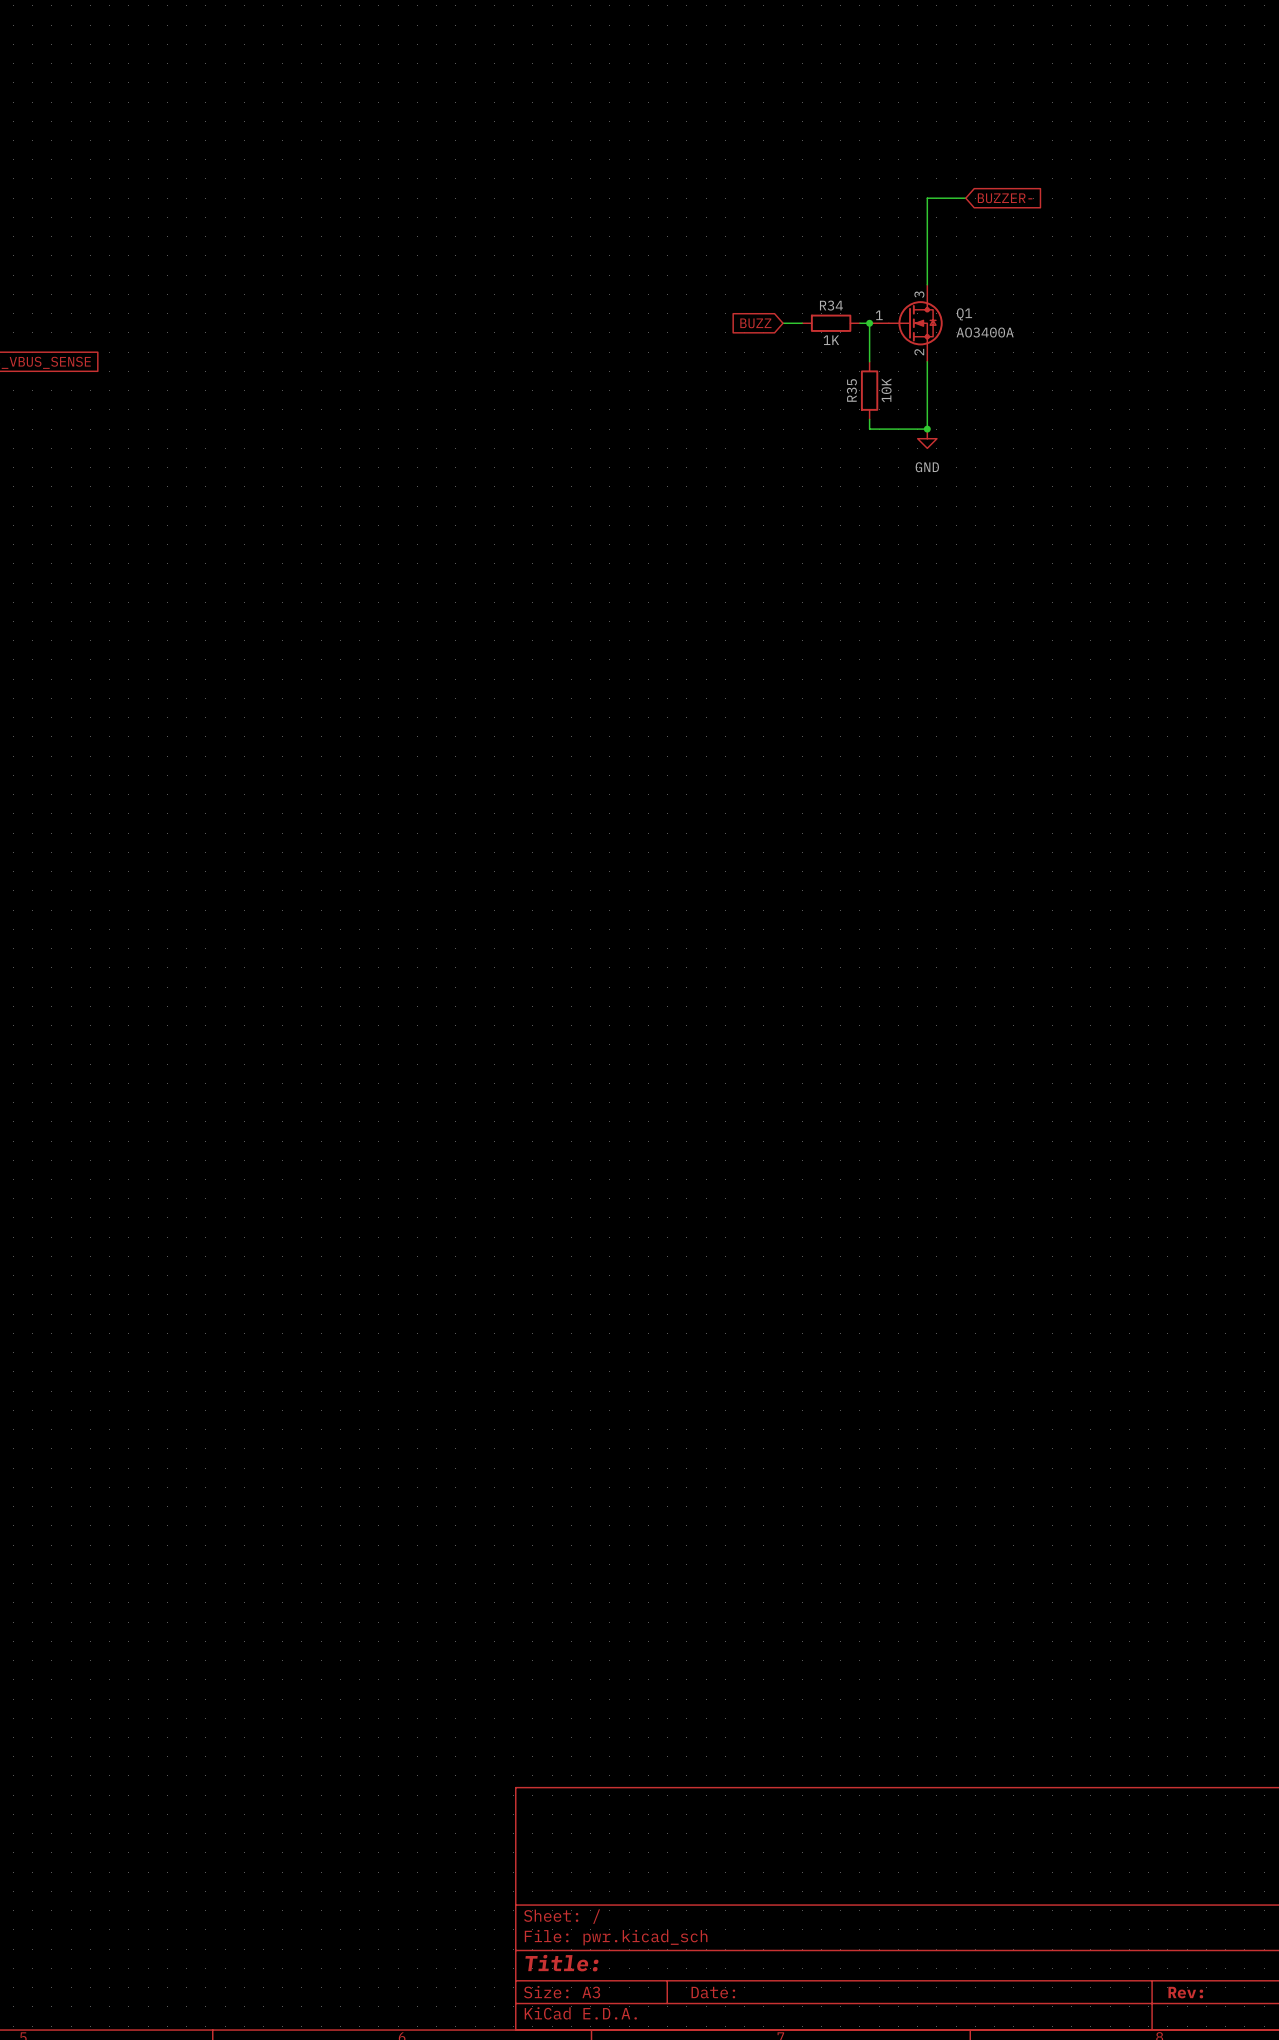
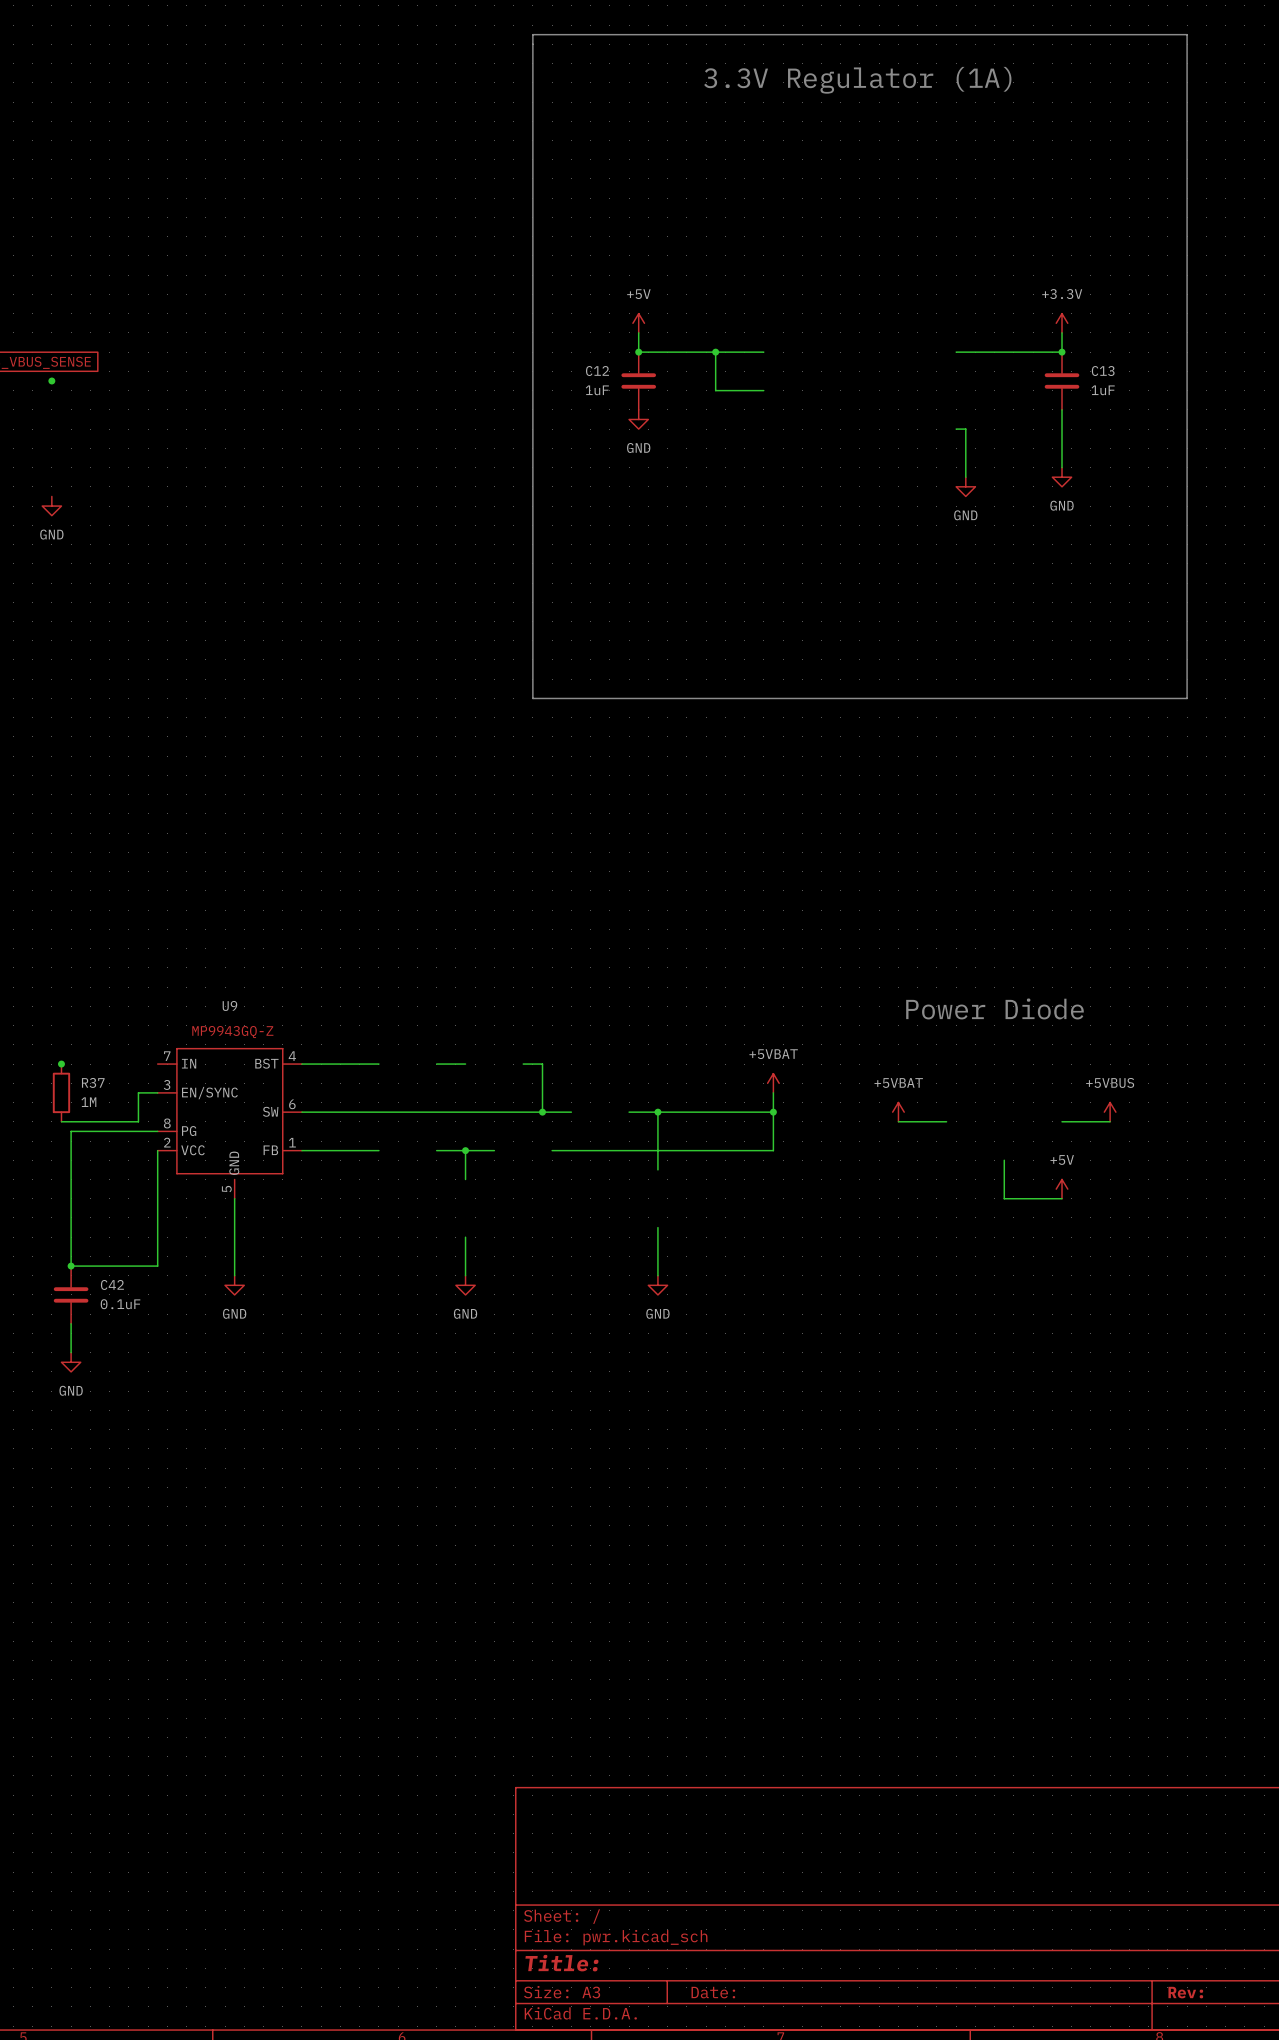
line: none -> (532, 34) (1187, 34) (1187, 698) (532, 698) (532, 34)
text: none -> 3.3V Regulator (1A) (857, 80)
wire: (965, 198) (927, 198) (927, 284) -> none
global label: BUZZER- (1005, 198) -> none
power symbol: none -> +5V (638, 323)
global label: BUZZ (755, 323) -> none
wire: (783, 323) (802, 323) -> none
R34: 1K (831, 323) -> none
wire: (859, 323) (869, 323) (869, 361) -> none
junction: (869, 323) -> none
Q1: AO3400A (906, 323) -> none
power symbol: none -> +3.3V (1062, 323)
wire: none -> (638, 332) (638, 352) (763, 352)
wire: none -> (1062, 332) (1062, 352) (956, 352)
junction: none -> (638, 352)
wire: none -> (715, 352) (715, 390) (763, 390)
junction: none -> (715, 352)
junction: none -> (1062, 352)
wire: (927, 361) (927, 429) (869, 429) (869, 419) -> none
junction: none -> (51, 380)
C12: none -> 1uF (638, 380)
C13: none -> 1uF (1062, 380)
R35: 10K (869, 390) -> none
wire: none -> (1062, 409) (1062, 467)
power symbol: none -> GND (638, 419)
junction: (927, 429) -> none
wire: none -> (956, 429) (965, 429) (965, 477)
power symbol position: GND (927, 438) -> GND (965, 486)
power symbol: none -> GND (1062, 477)
power symbol: none -> GND (51, 506)
text: none -> Power Diode (994, 1008)
junction: none -> (61, 1064)
wire: none -> (301, 1064) (378, 1064)
wire: none -> (436, 1064) (465, 1064)
wire: none -> (523, 1064) (542, 1064) (542, 1112)
power symbol: none -> +5VBAT (773, 1083)
R37: none -> 1M (61, 1092)
wire: none -> (157, 1092) (138, 1092) (138, 1121) (61, 1121)
wire: none -> (773, 1092) (773, 1150) (552, 1150)
wire: none -> (301, 1112) (571, 1112)
junction: none -> (542, 1112)
wire: none -> (629, 1112) (773, 1112)
wire: none -> (657, 1112) (657, 1169)
junction: none -> (657, 1112)
junction: none -> (773, 1112)
power symbol: none -> +5VBAT (898, 1112)
power symbol: none -> +5VBUS (1110, 1112)
wire: none -> (898, 1121) (946, 1121)
wire: none -> (1062, 1121) (1110, 1121)
U9: none -> (229, 1123)
wire: none -> (157, 1131) (71, 1131) (71, 1266) (157, 1266) (157, 1150)
wire: none -> (301, 1150) (378, 1150)
wire: none -> (436, 1150) (494, 1150)
wire: none -> (465, 1150) (465, 1179)
junction: none -> (465, 1150)
wire: none -> (1004, 1160) (1004, 1198) (1062, 1198)
power symbol: none -> +5V (1062, 1189)
wire: none -> (234, 1198) (234, 1275)
wire: none -> (657, 1227) (657, 1275)
wire: none -> (465, 1237) (465, 1275)
junction: none -> (71, 1266)
power symbol: none -> GND (234, 1285)
power symbol: none -> GND (465, 1285)
power symbol: none -> GND (657, 1285)
C42: none -> 0.1uF (71, 1294)
wire: none -> (71, 1323) (71, 1352)
power symbol: none -> GND (71, 1362)

